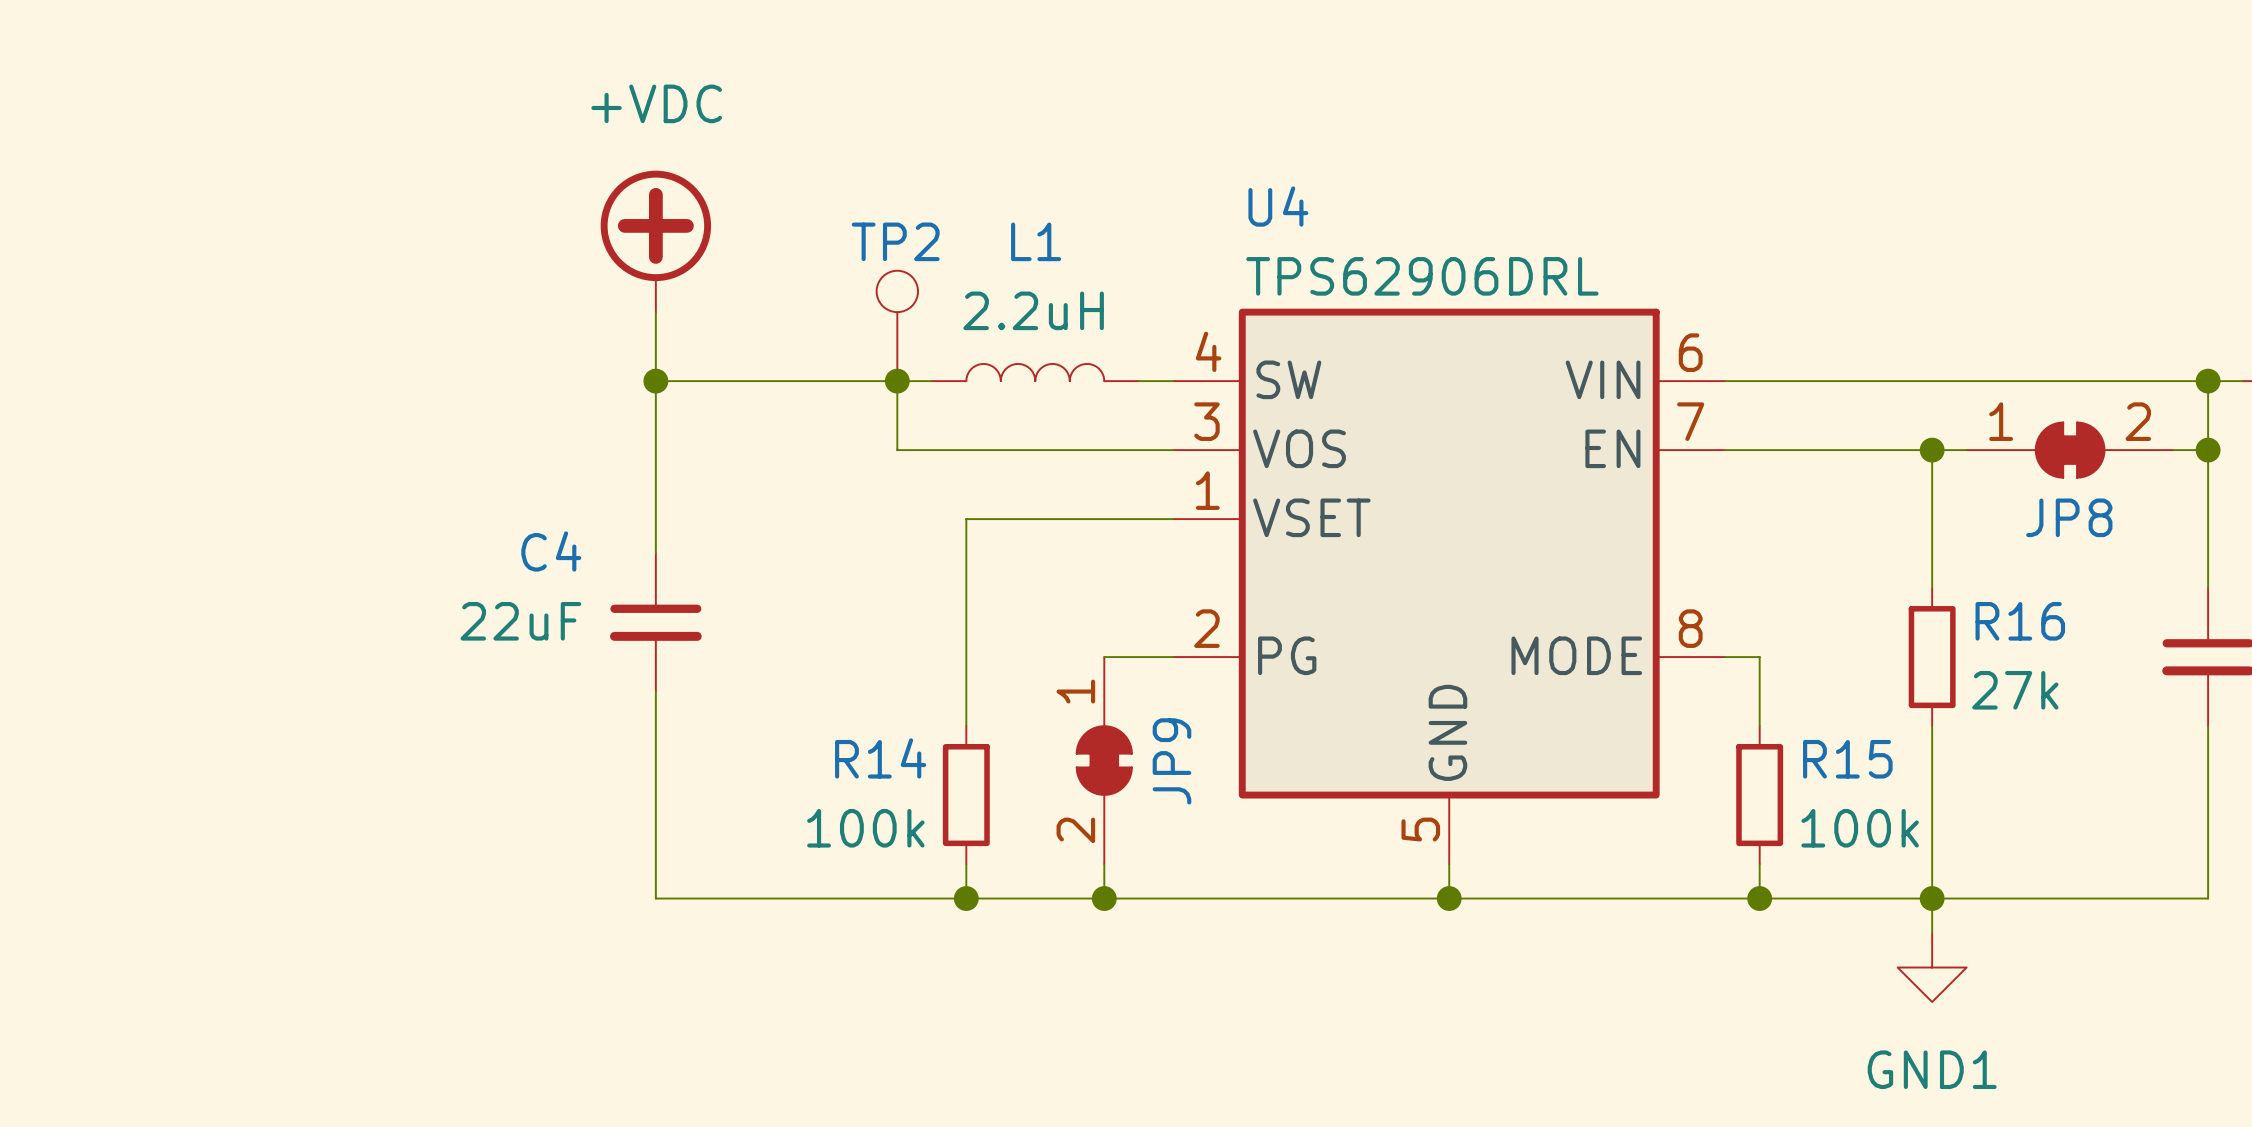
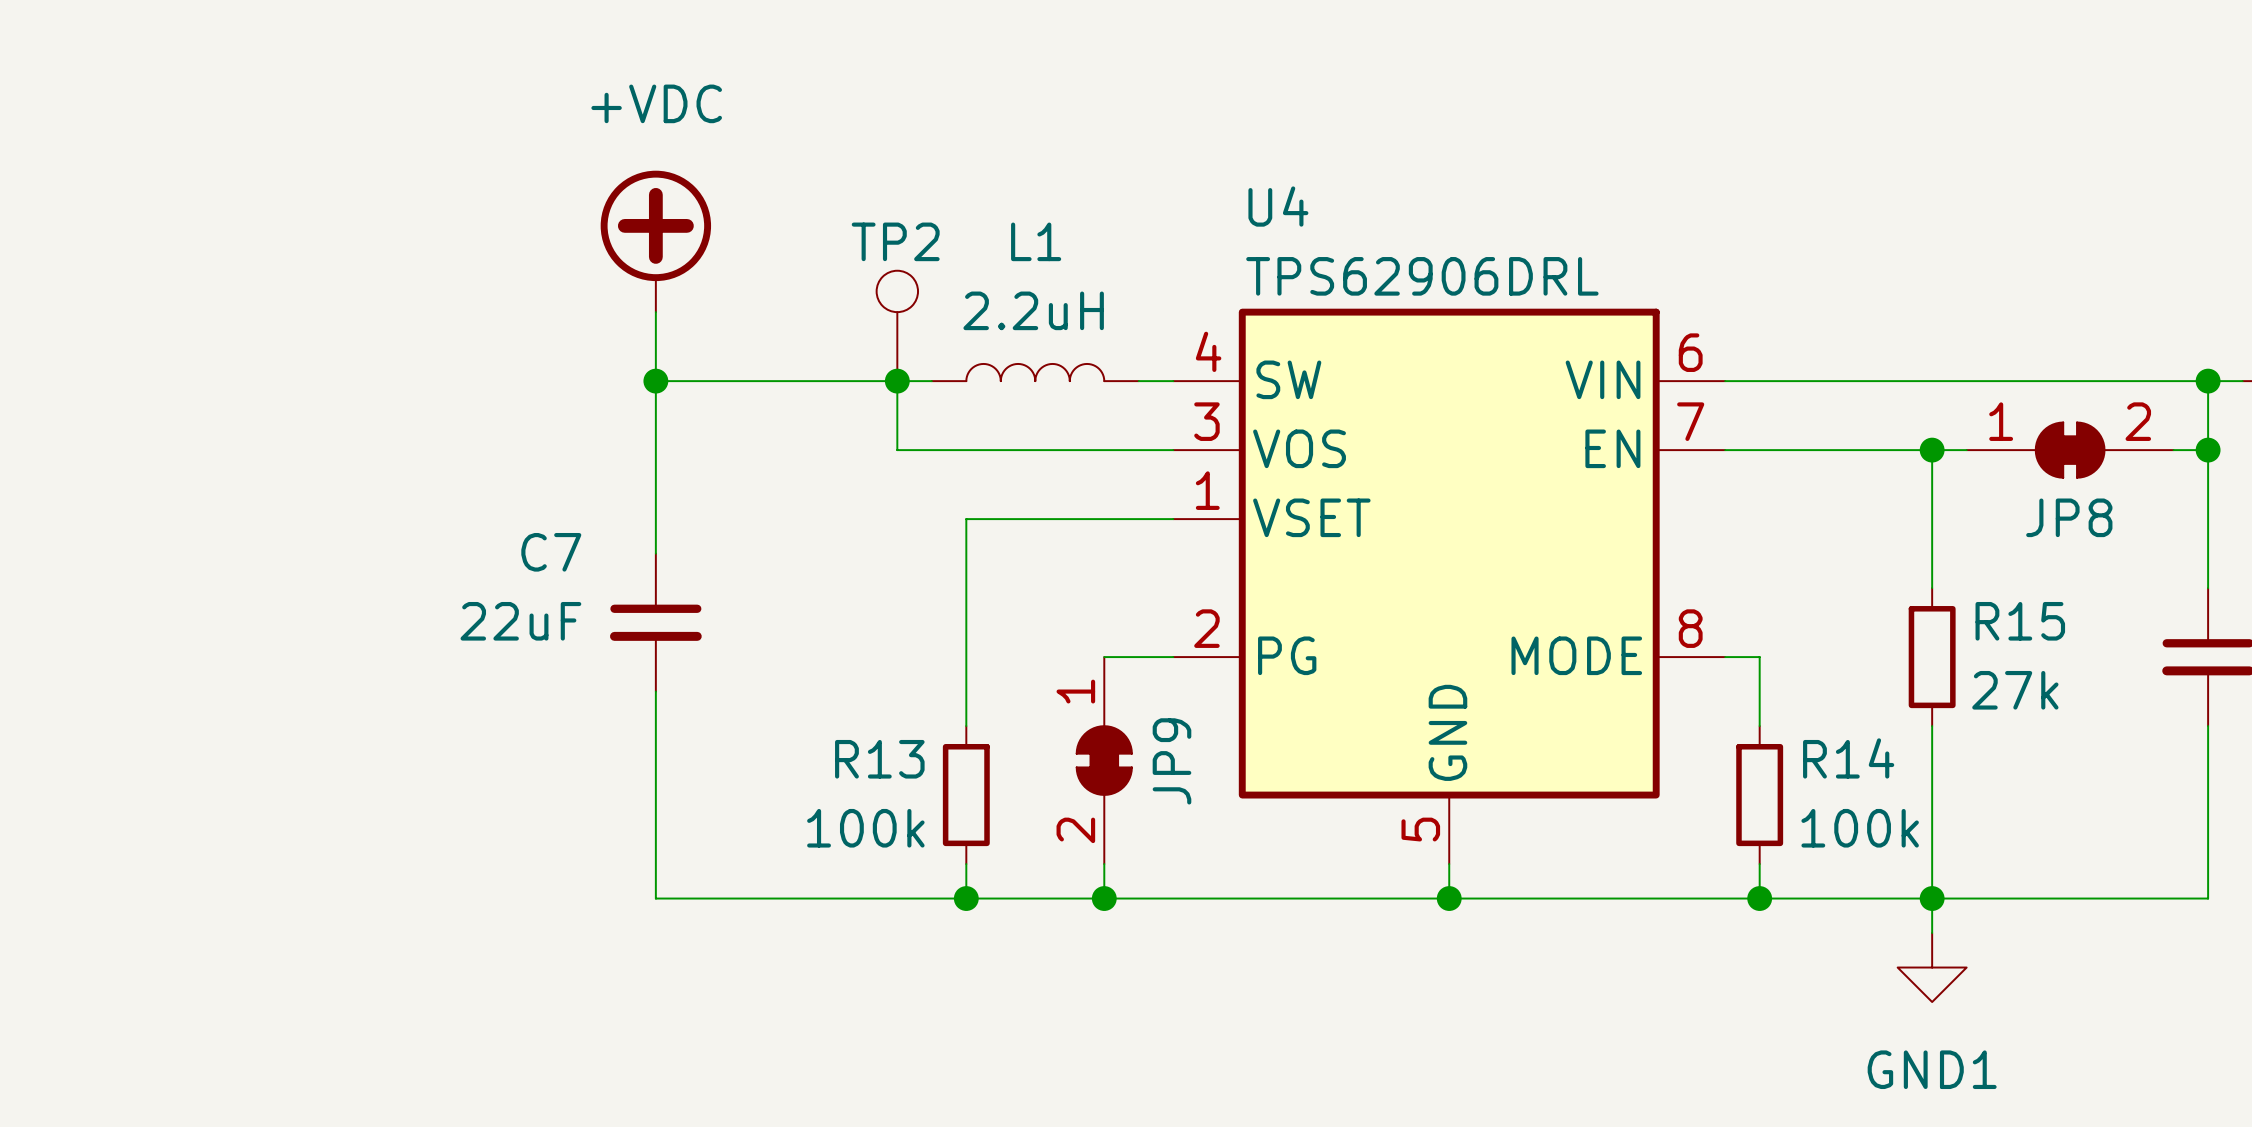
C4 name: C4 (551, 551) -> C7 (551, 552)
R16 name: R16 (2020, 621) -> R15 (2020, 621)
R14 name: R14 (880, 758) -> R13 (879, 759)
R15 name: R15 (1847, 759) -> R14 (1848, 758)

